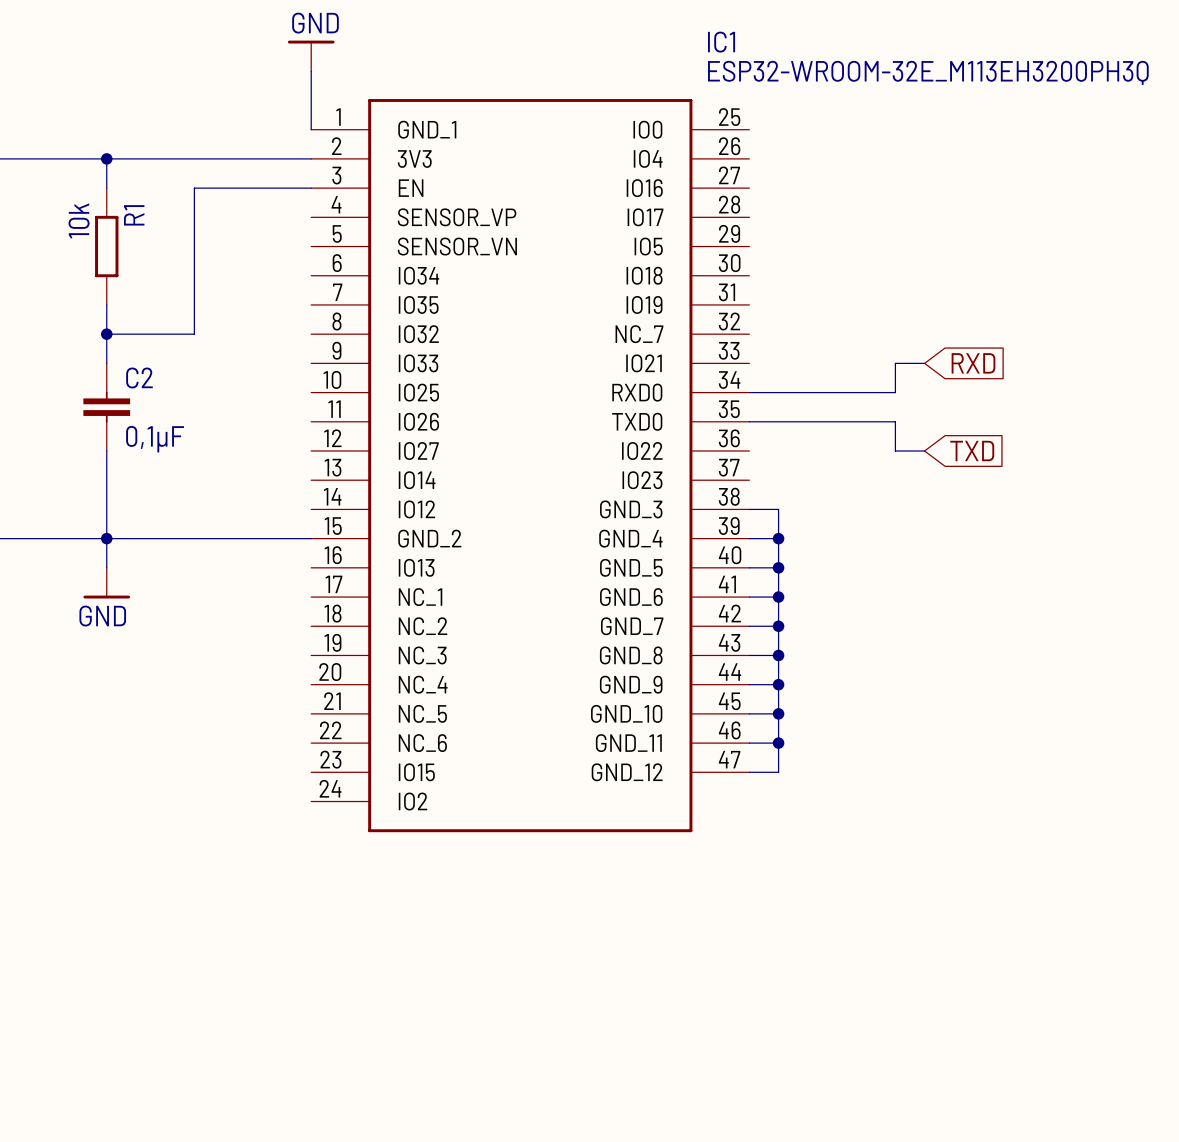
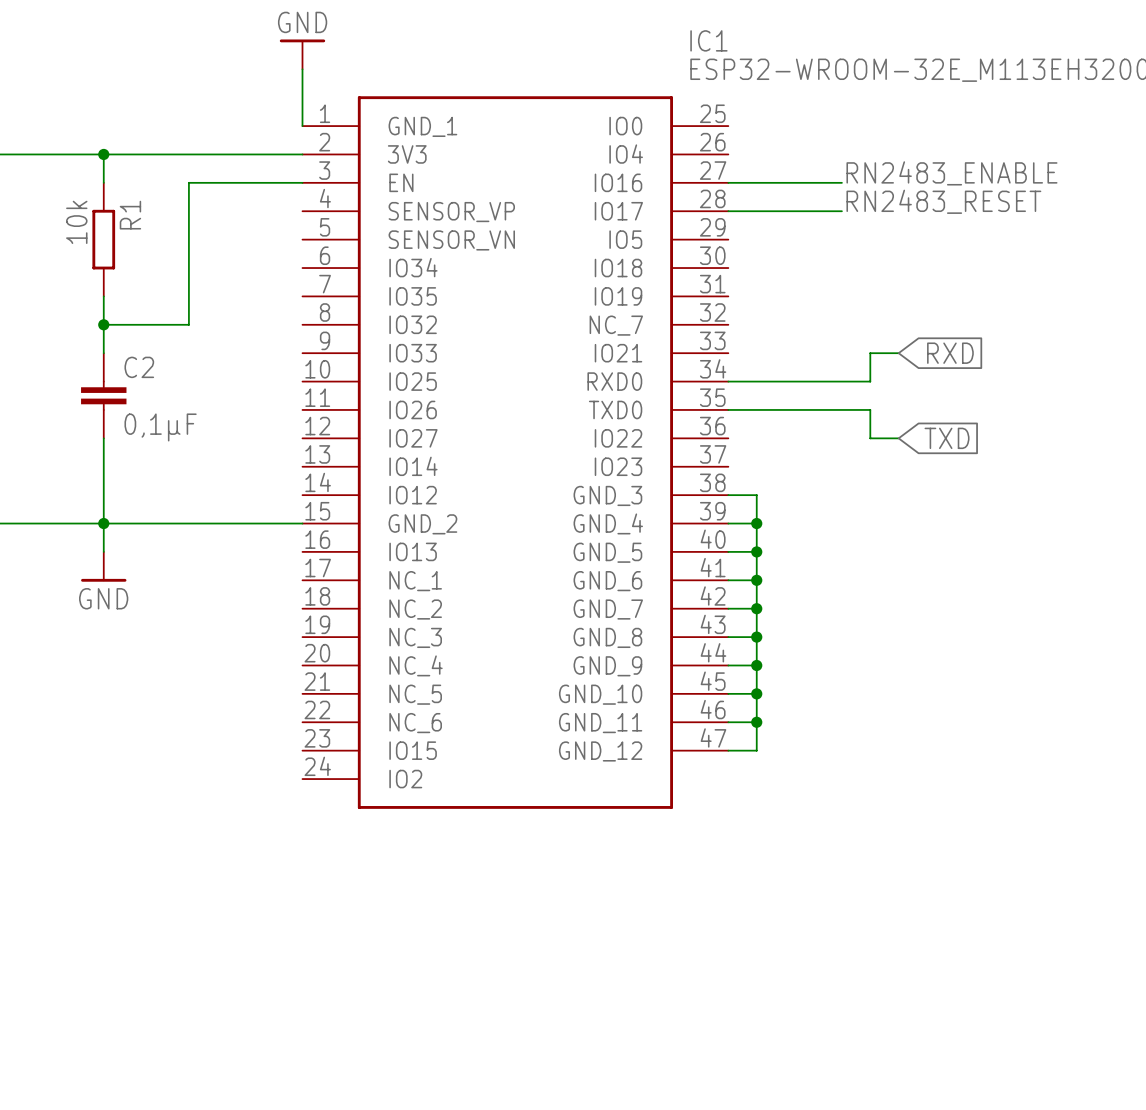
label: none -> RN2483_ENABLE (951, 173)
wire: none -> (728, 182) (841, 182)
label: none -> RN2483_RESET (943, 201)
wire: none -> (728, 211) (841, 211)

